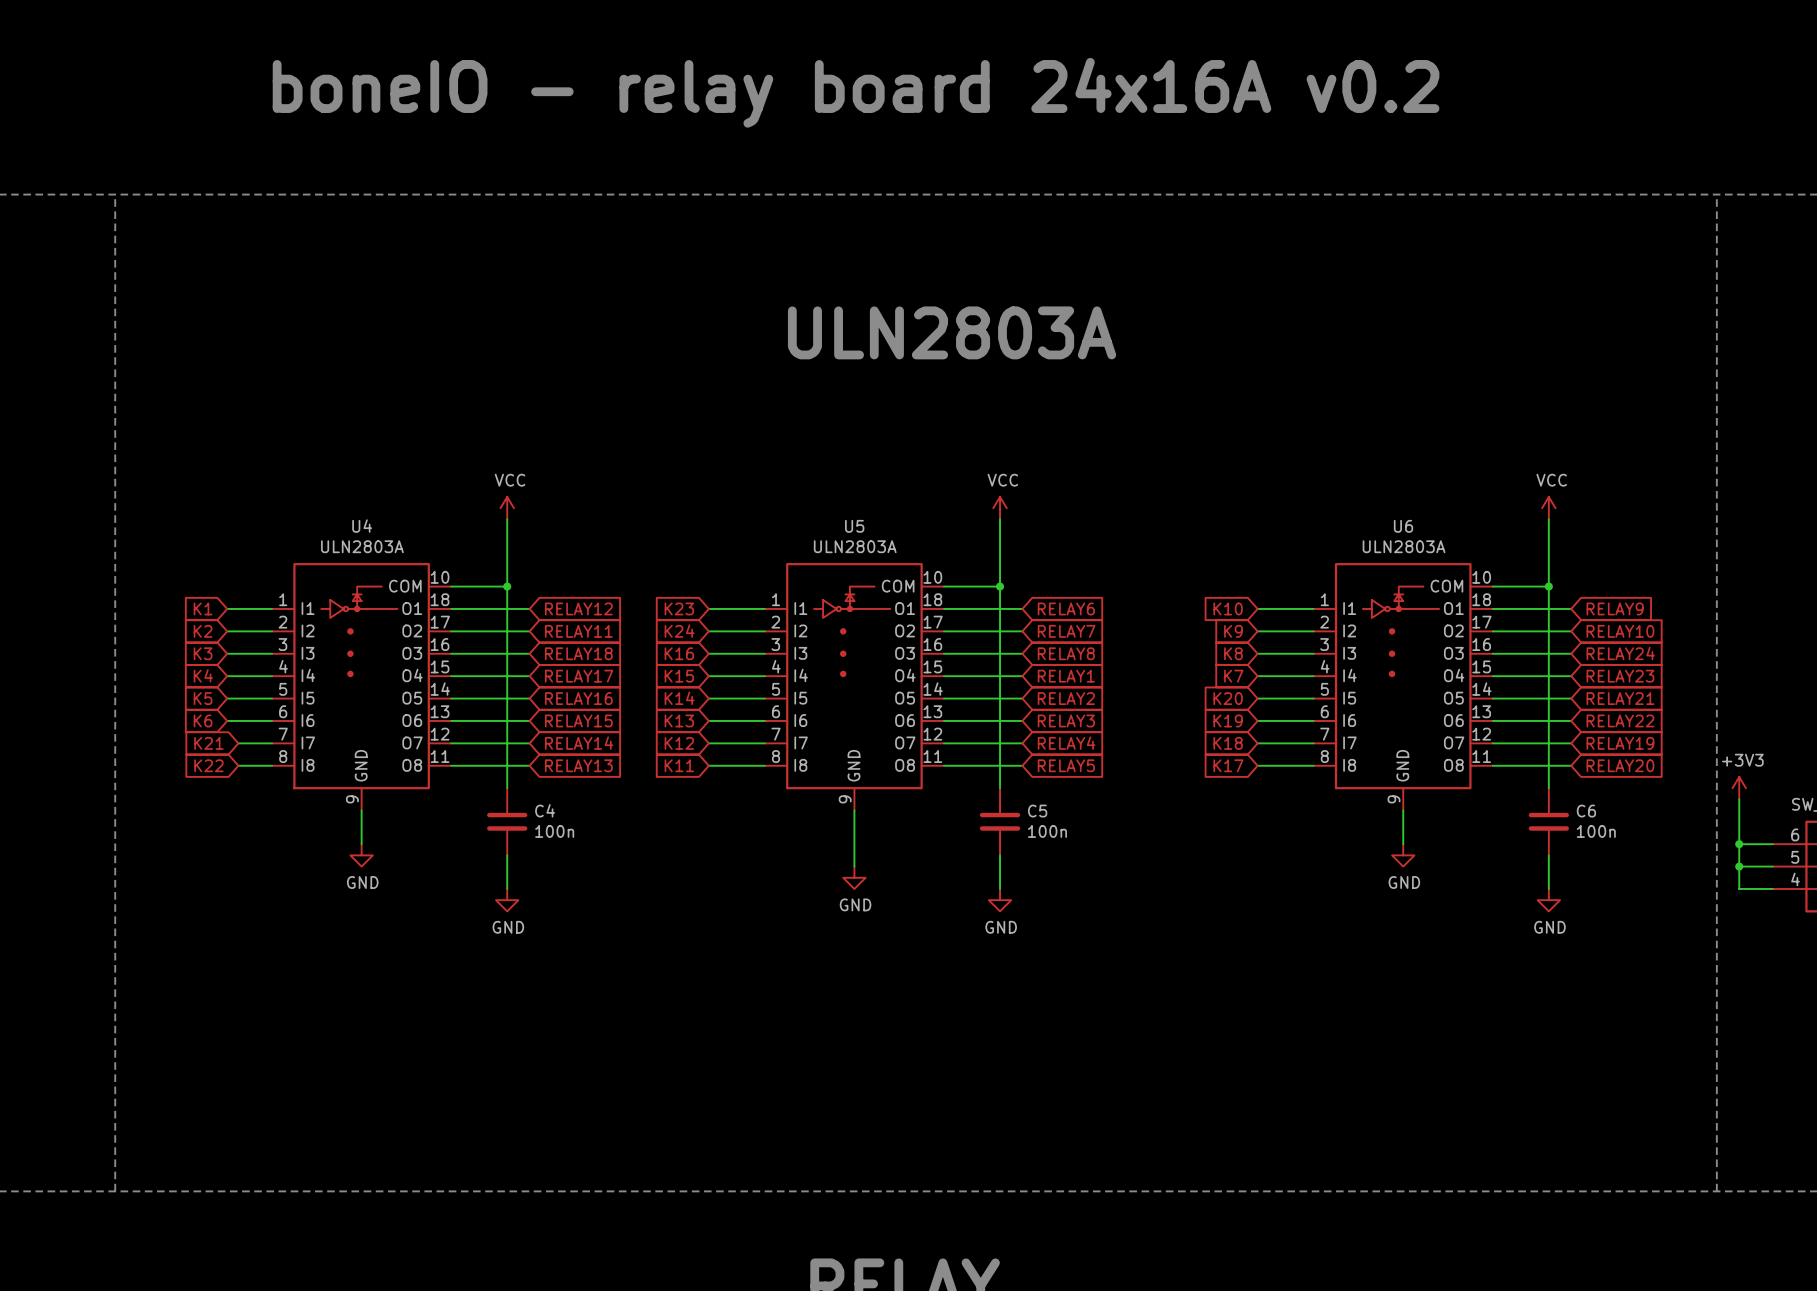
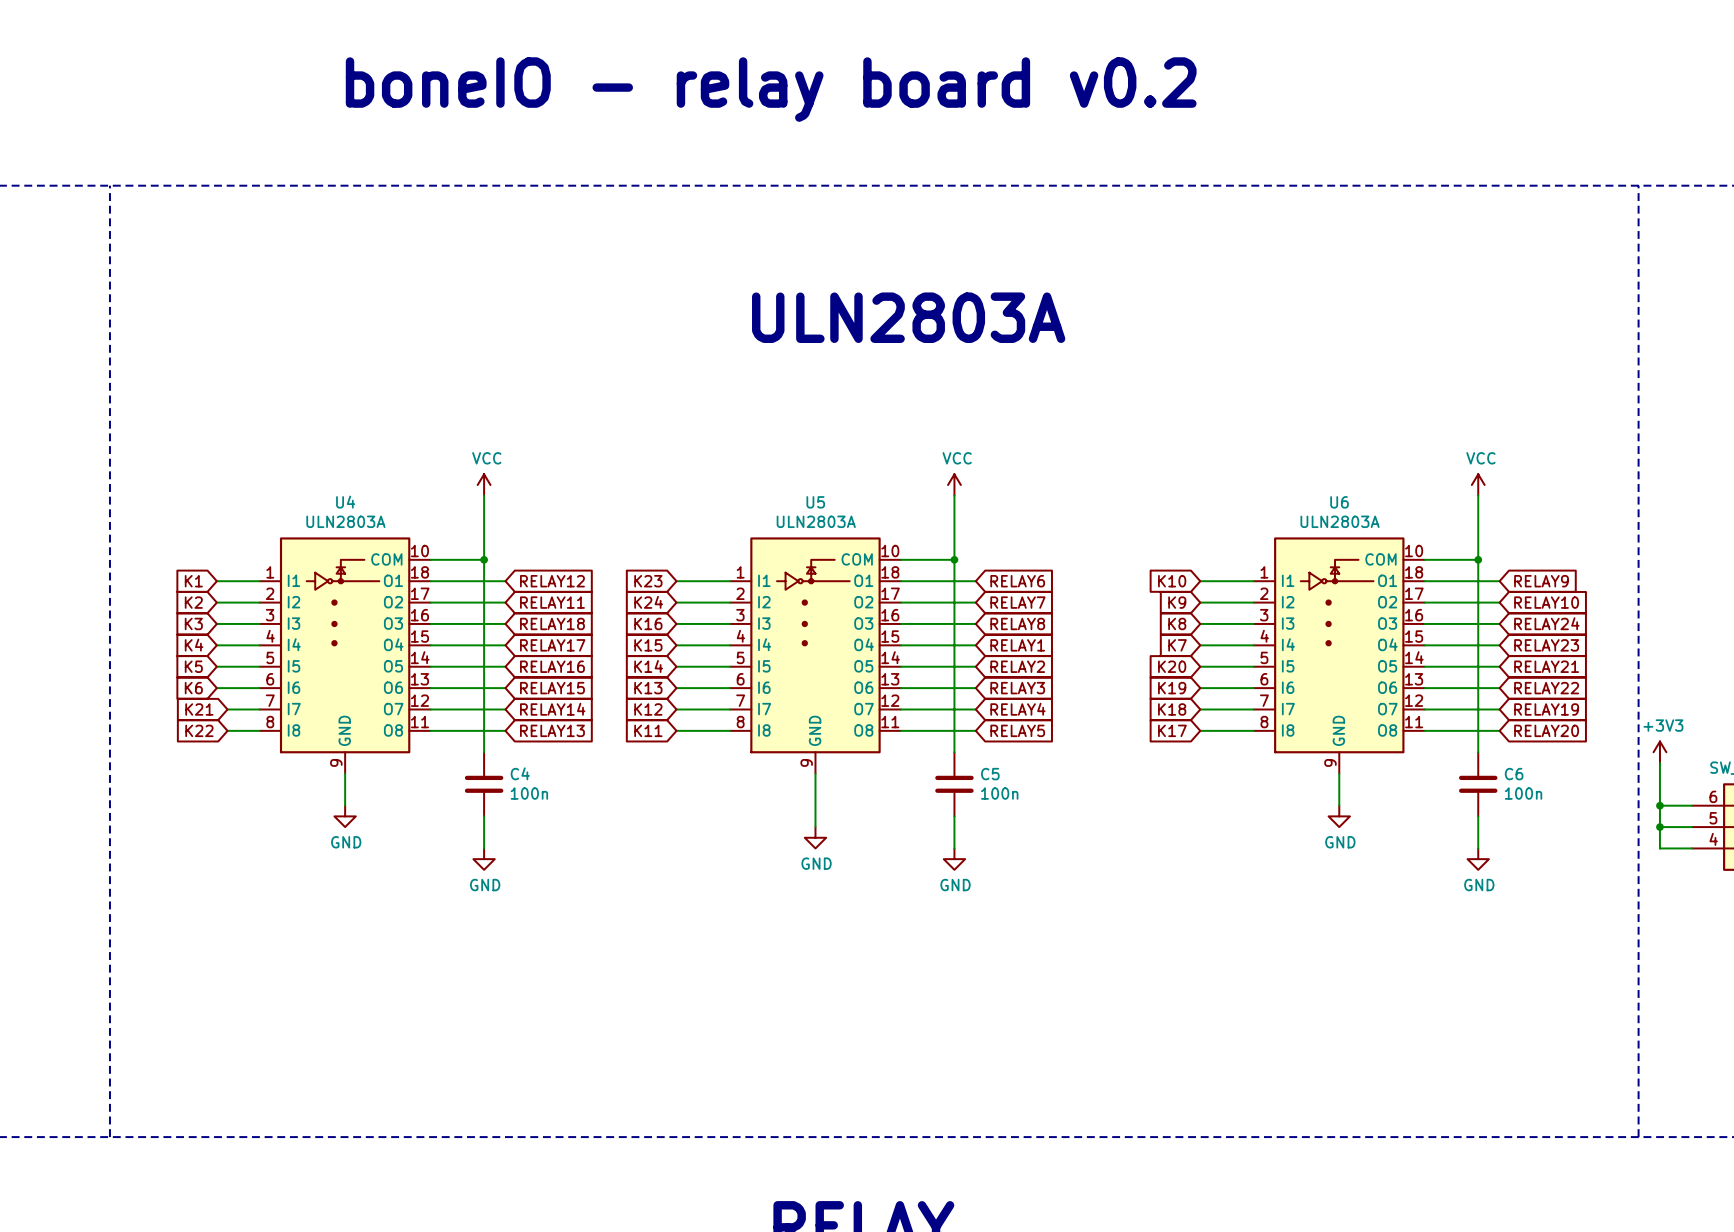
text: boneIO - relay board 24x16A v0.2 (856, 92) -> boneIO - relay board v0.2 (771, 89)

